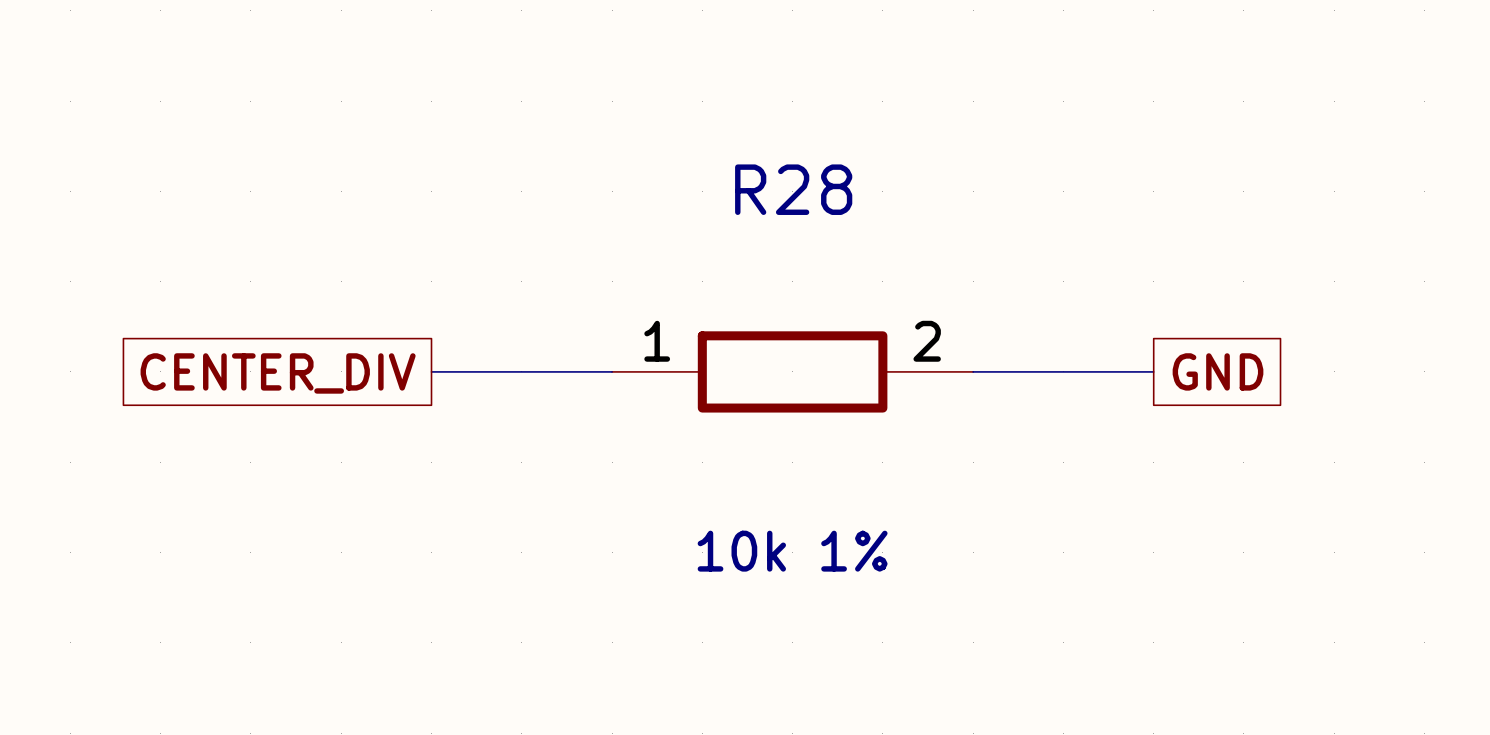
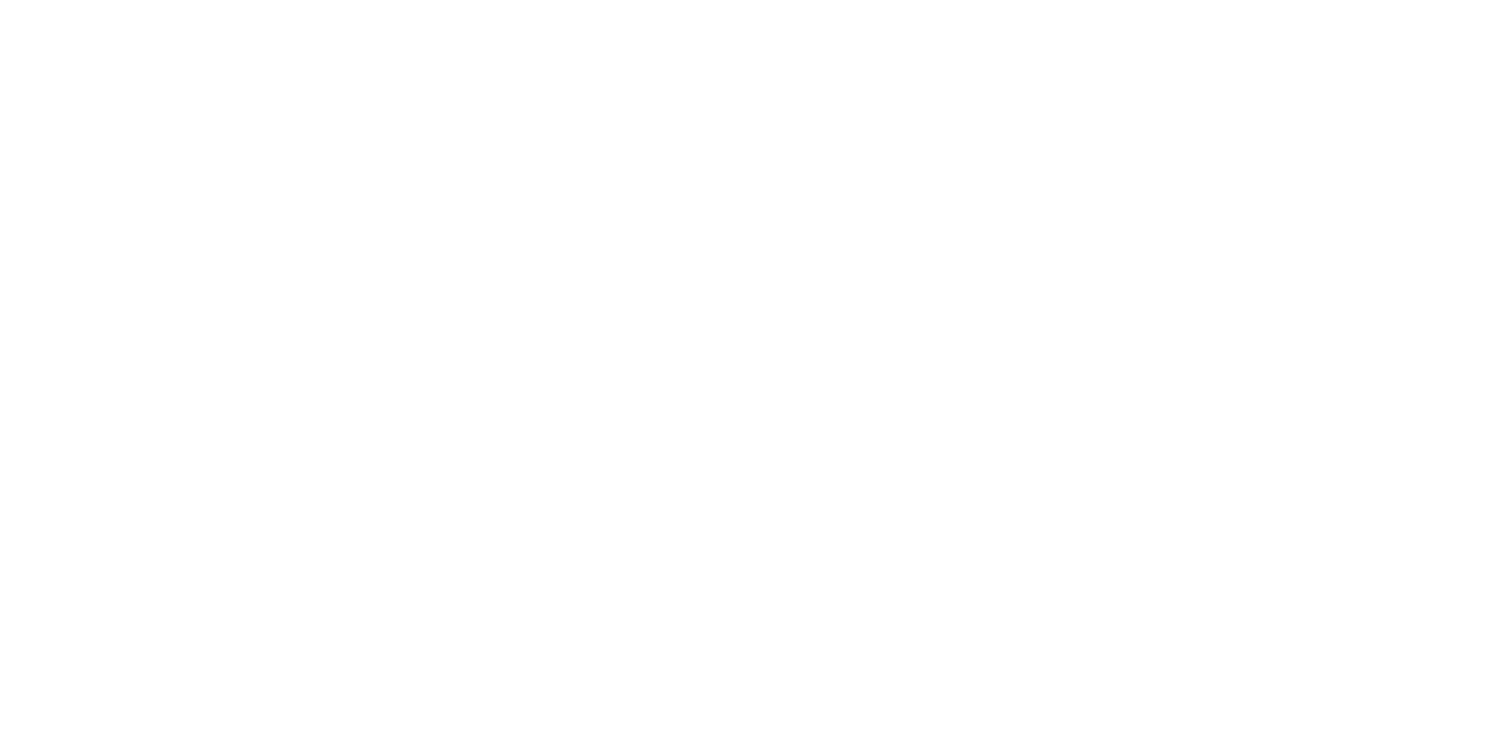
wire: (431, 371) (612, 371) -> none
R28: 10k 1% (792, 371) -> none
wire: (973, 371) (1153, 371) -> none
global label: GND (1218, 371) -> none
global label: CENTER_DIV (278, 373) -> none

